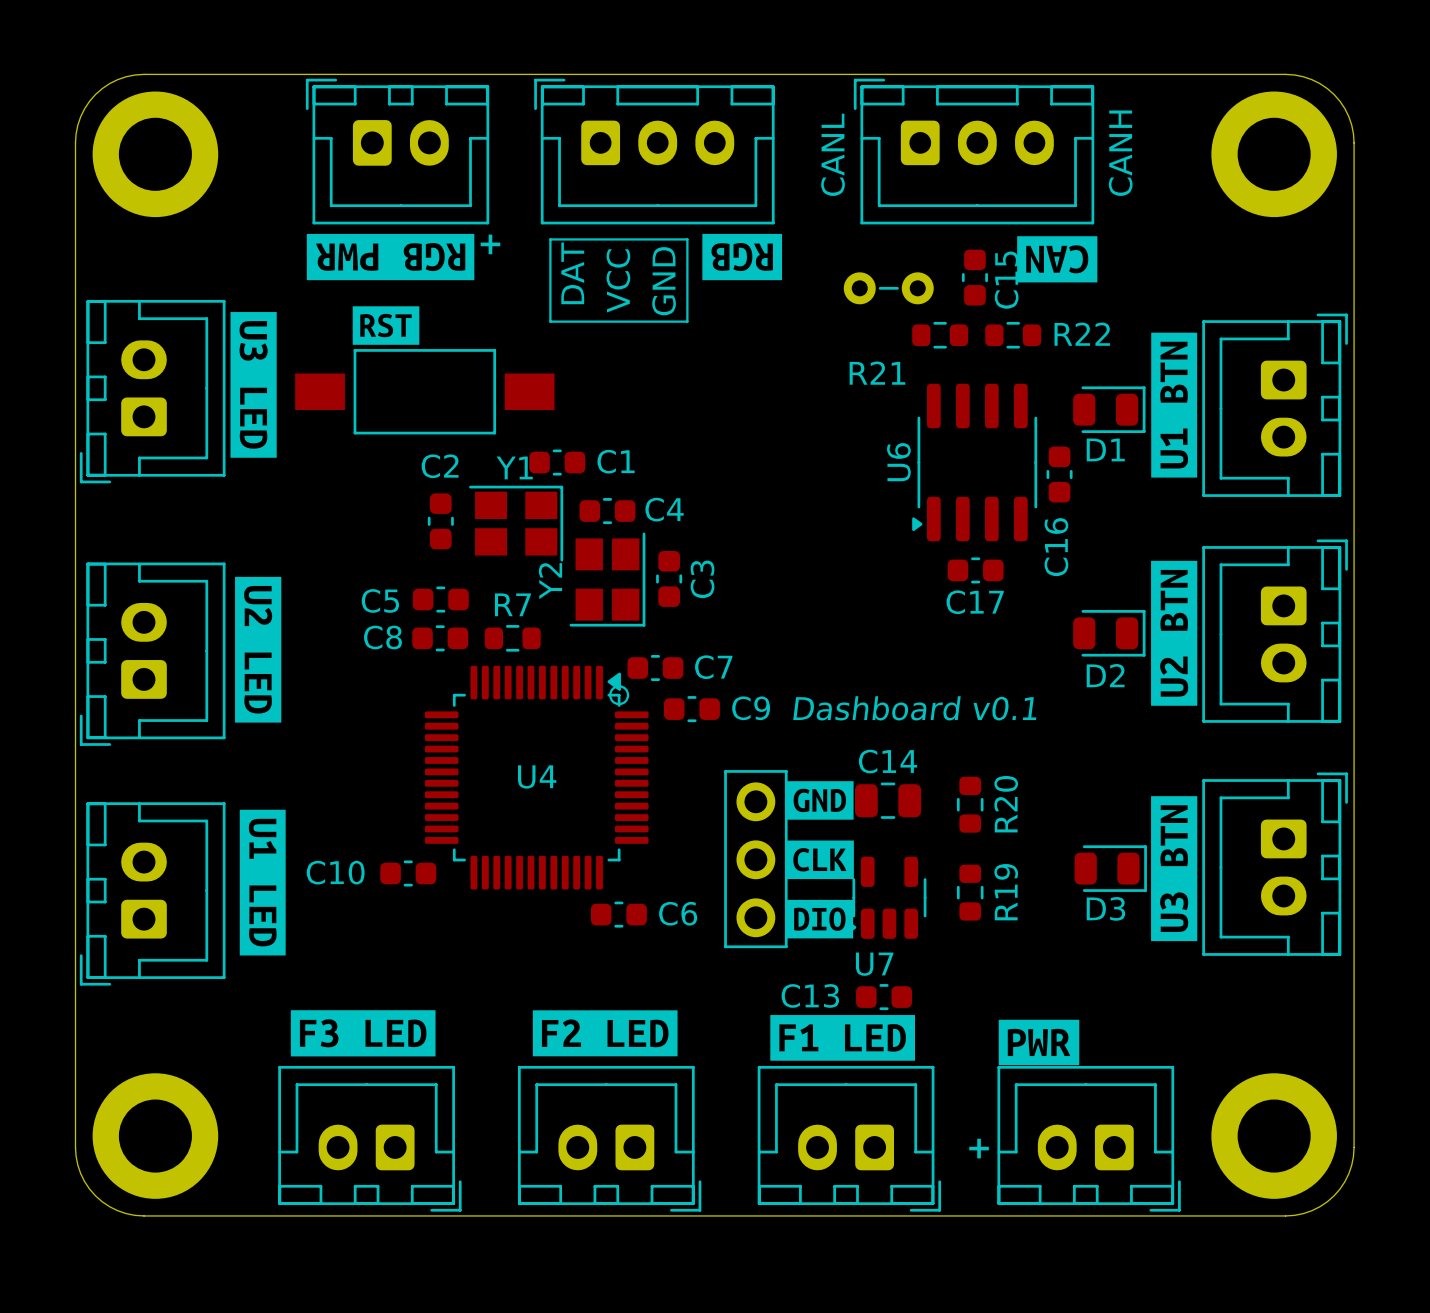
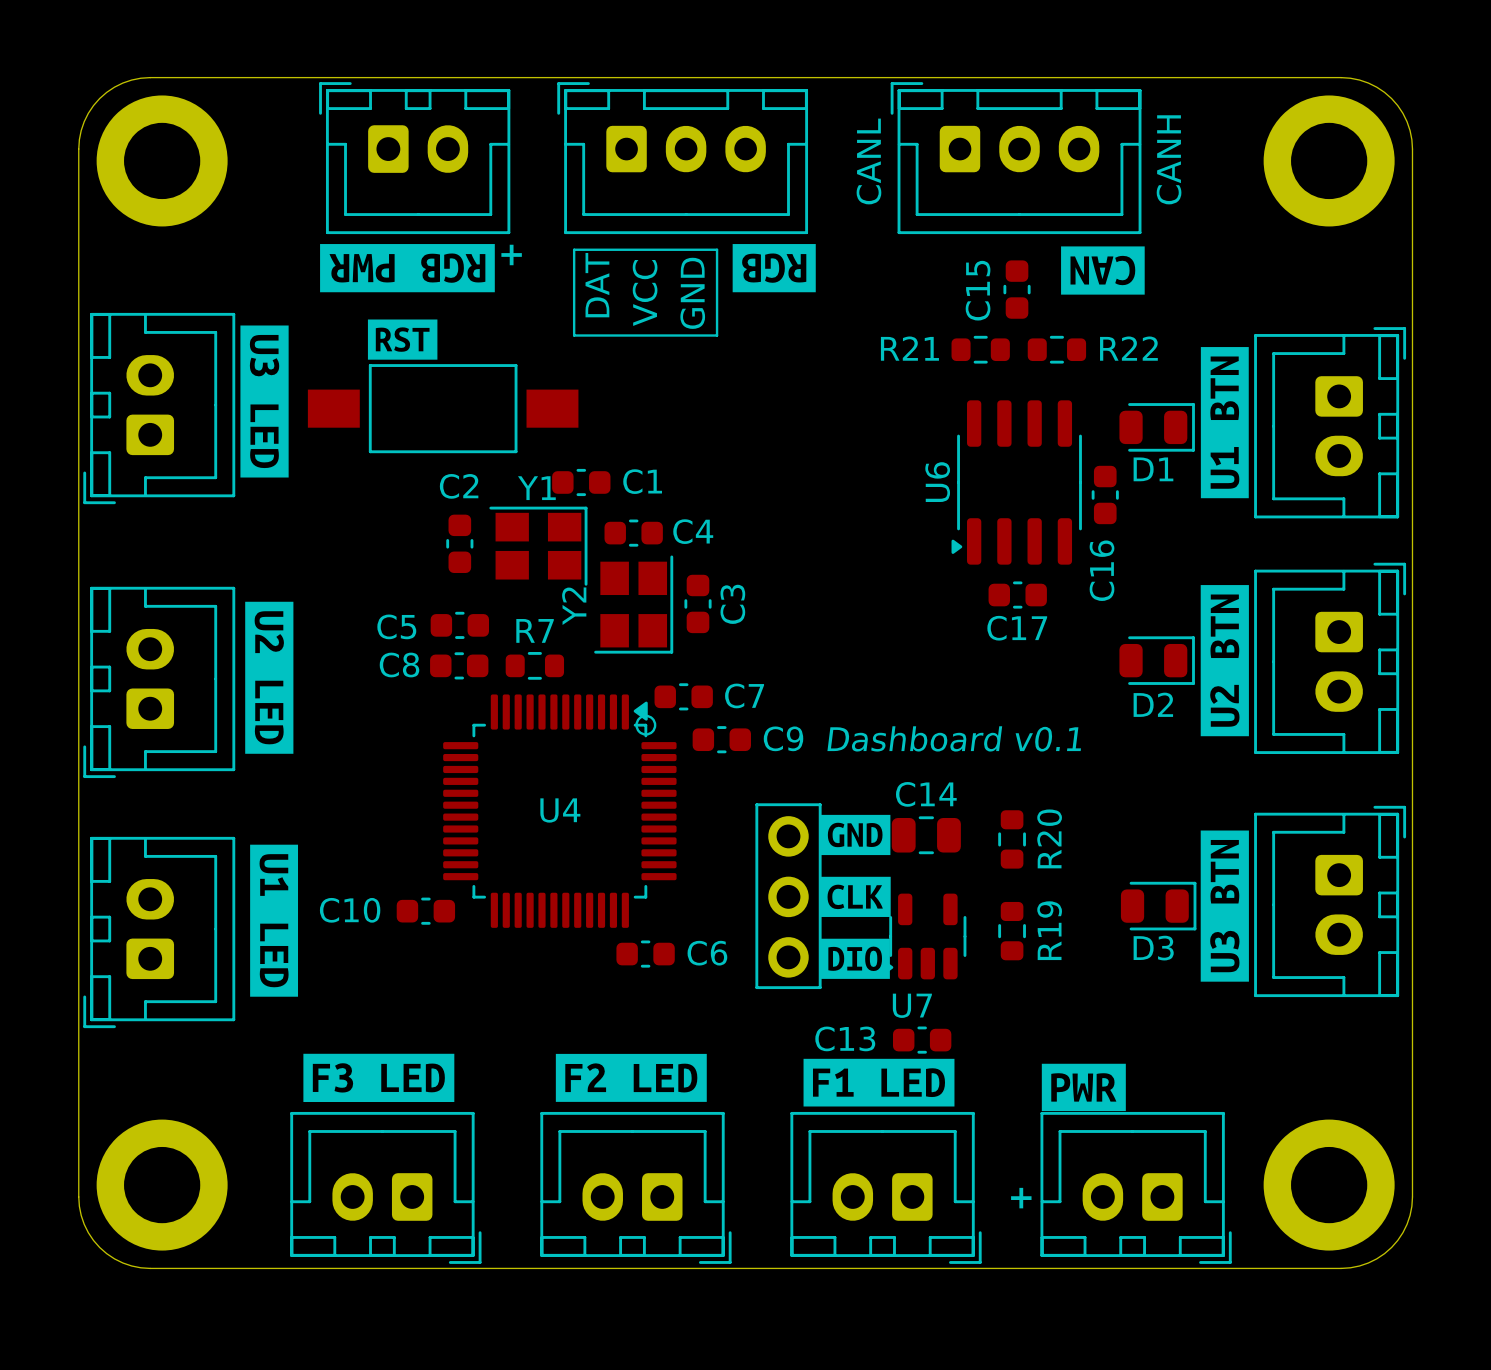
C15 name position: C15 (1006, 280) -> C15 (978, 290)
part: (888, 288) -> none
R21 name position: R21 (877, 373) -> R21 (909, 348)

